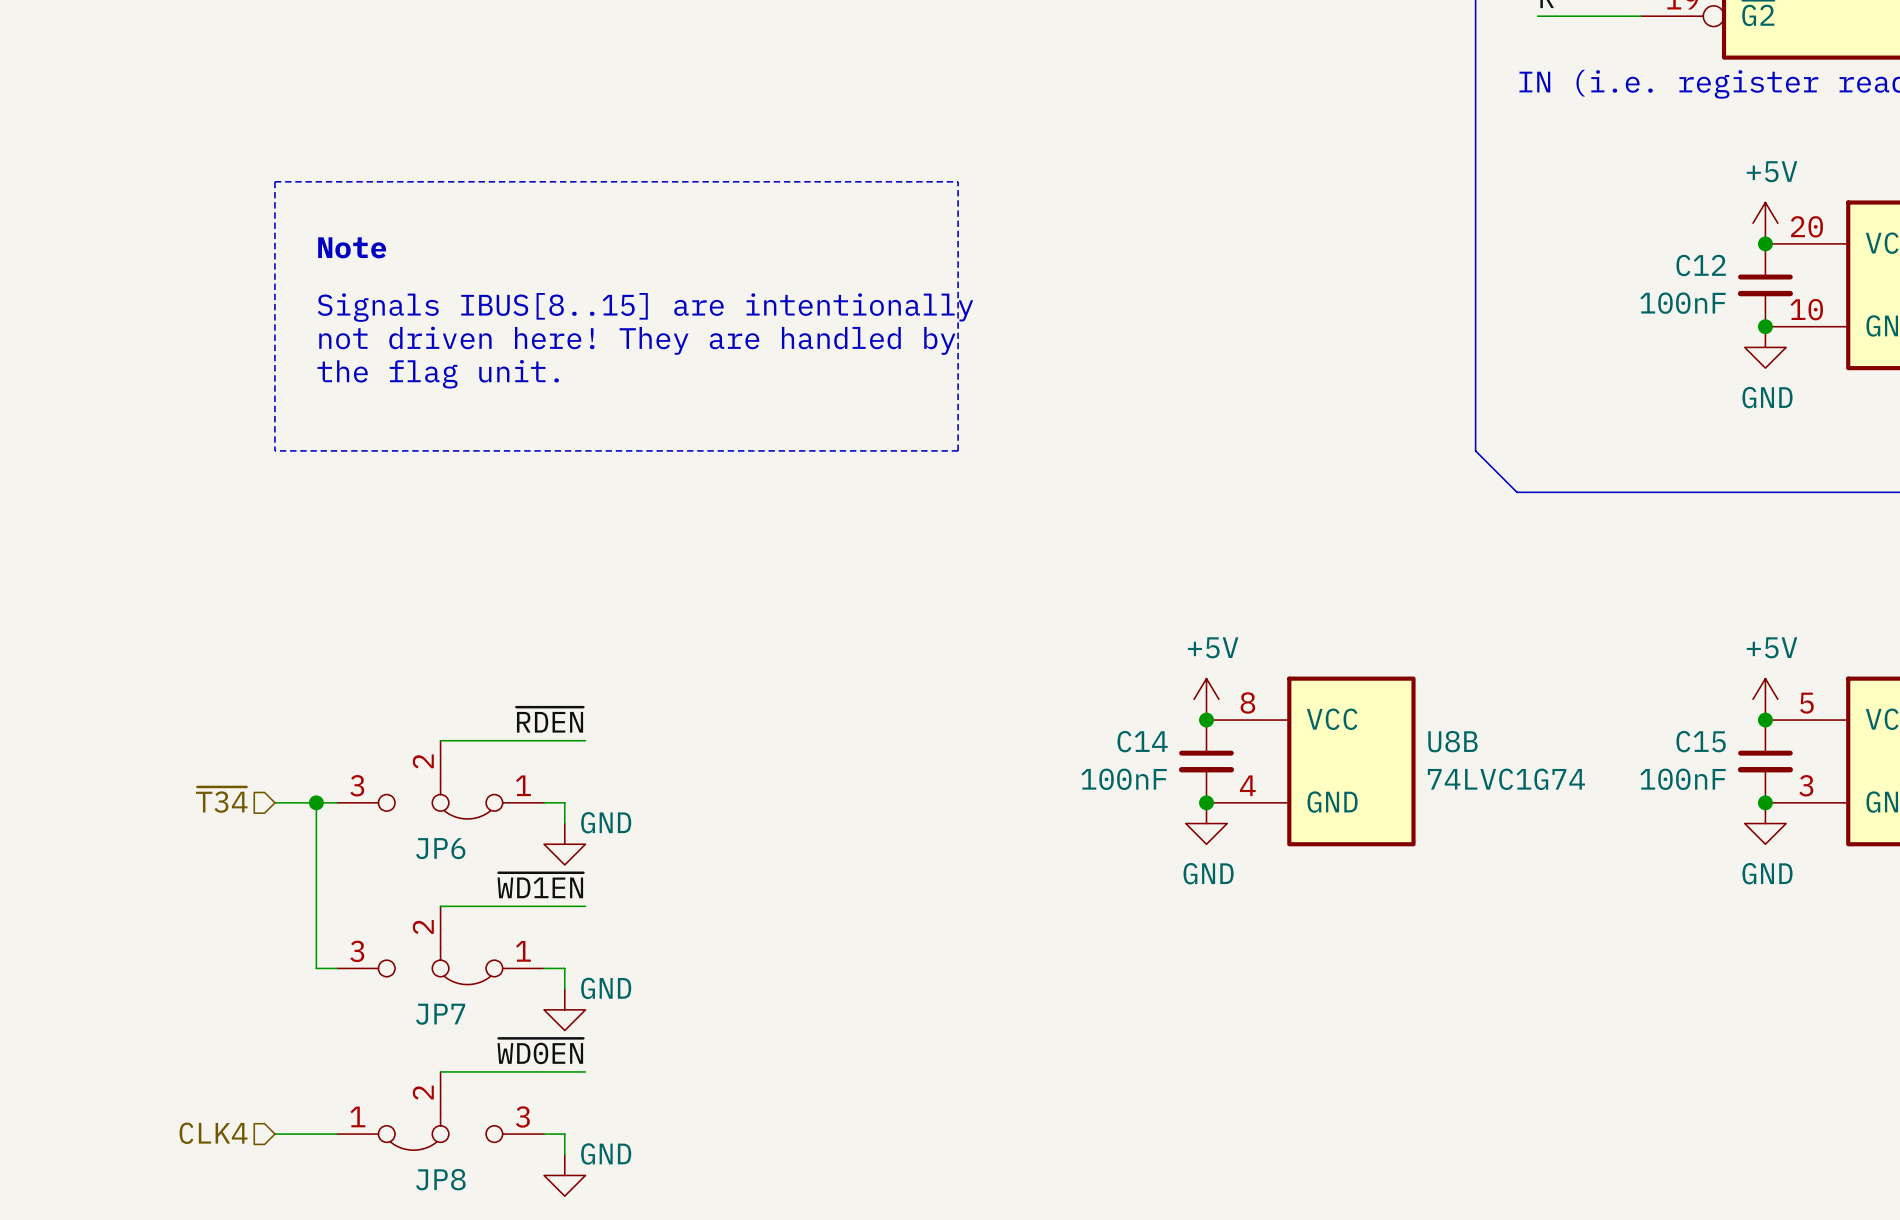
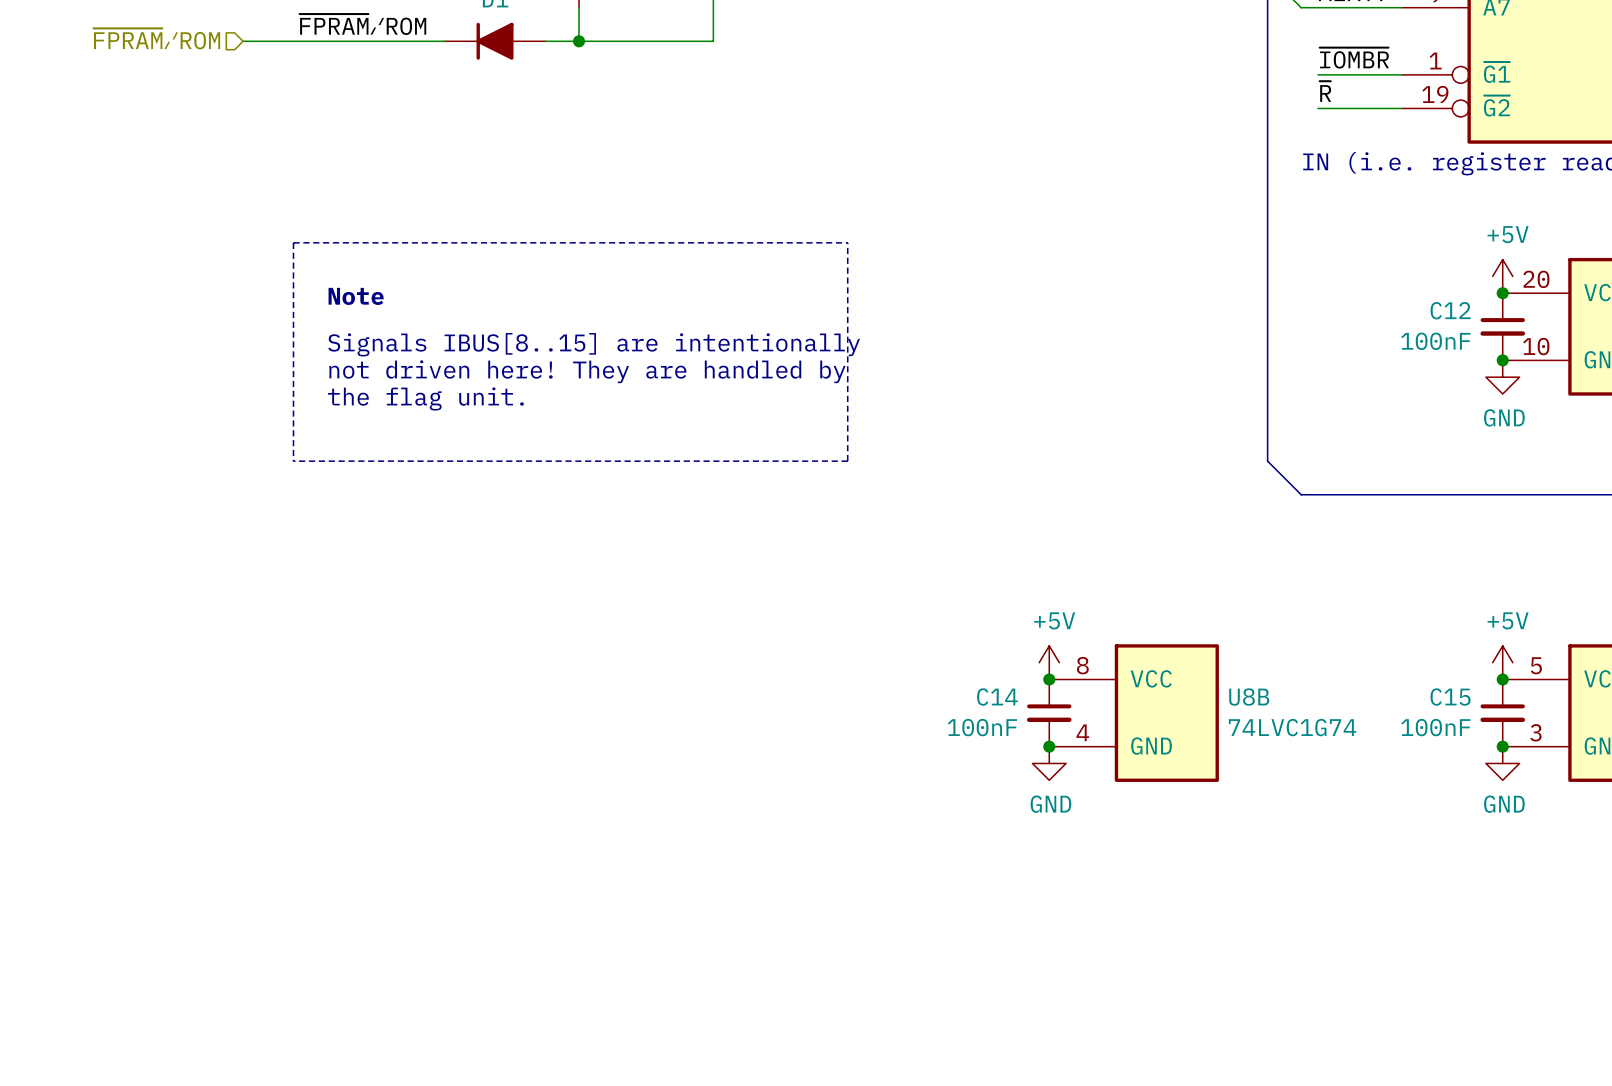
label: ~{RDEN} (549, 719) -> none
wire: (440, 740) (585, 740) -> none
JP6: (440, 779) -> none
hierarchical label: ~{T34} (221, 799) -> none
wire: (274, 802) (337, 802) -> none
wire: (316, 802) (316, 968) (337, 968) -> none
junction: (316, 802) -> none
wire: (544, 802) (564, 802) (564, 823) -> none
power symbol: GND (564, 844) -> none
label: ~{WD1EN} (540, 885) -> none
wire: (440, 906) (585, 906) -> none
JP7: (440, 945) -> none
wire: (544, 968) (564, 968) (564, 989) -> none
power symbol: GND (564, 1009) -> none
label: ~{WD0EN} (540, 1051) -> none
wire: (440, 1071) (585, 1071) -> none
JP8: (440, 1111) -> none
hierarchical label: CLK4 (213, 1133) -> none
wire: (274, 1134) (337, 1134) -> none
wire: (544, 1134) (564, 1134) (564, 1154) -> none
power symbol: GND (564, 1175) -> none

